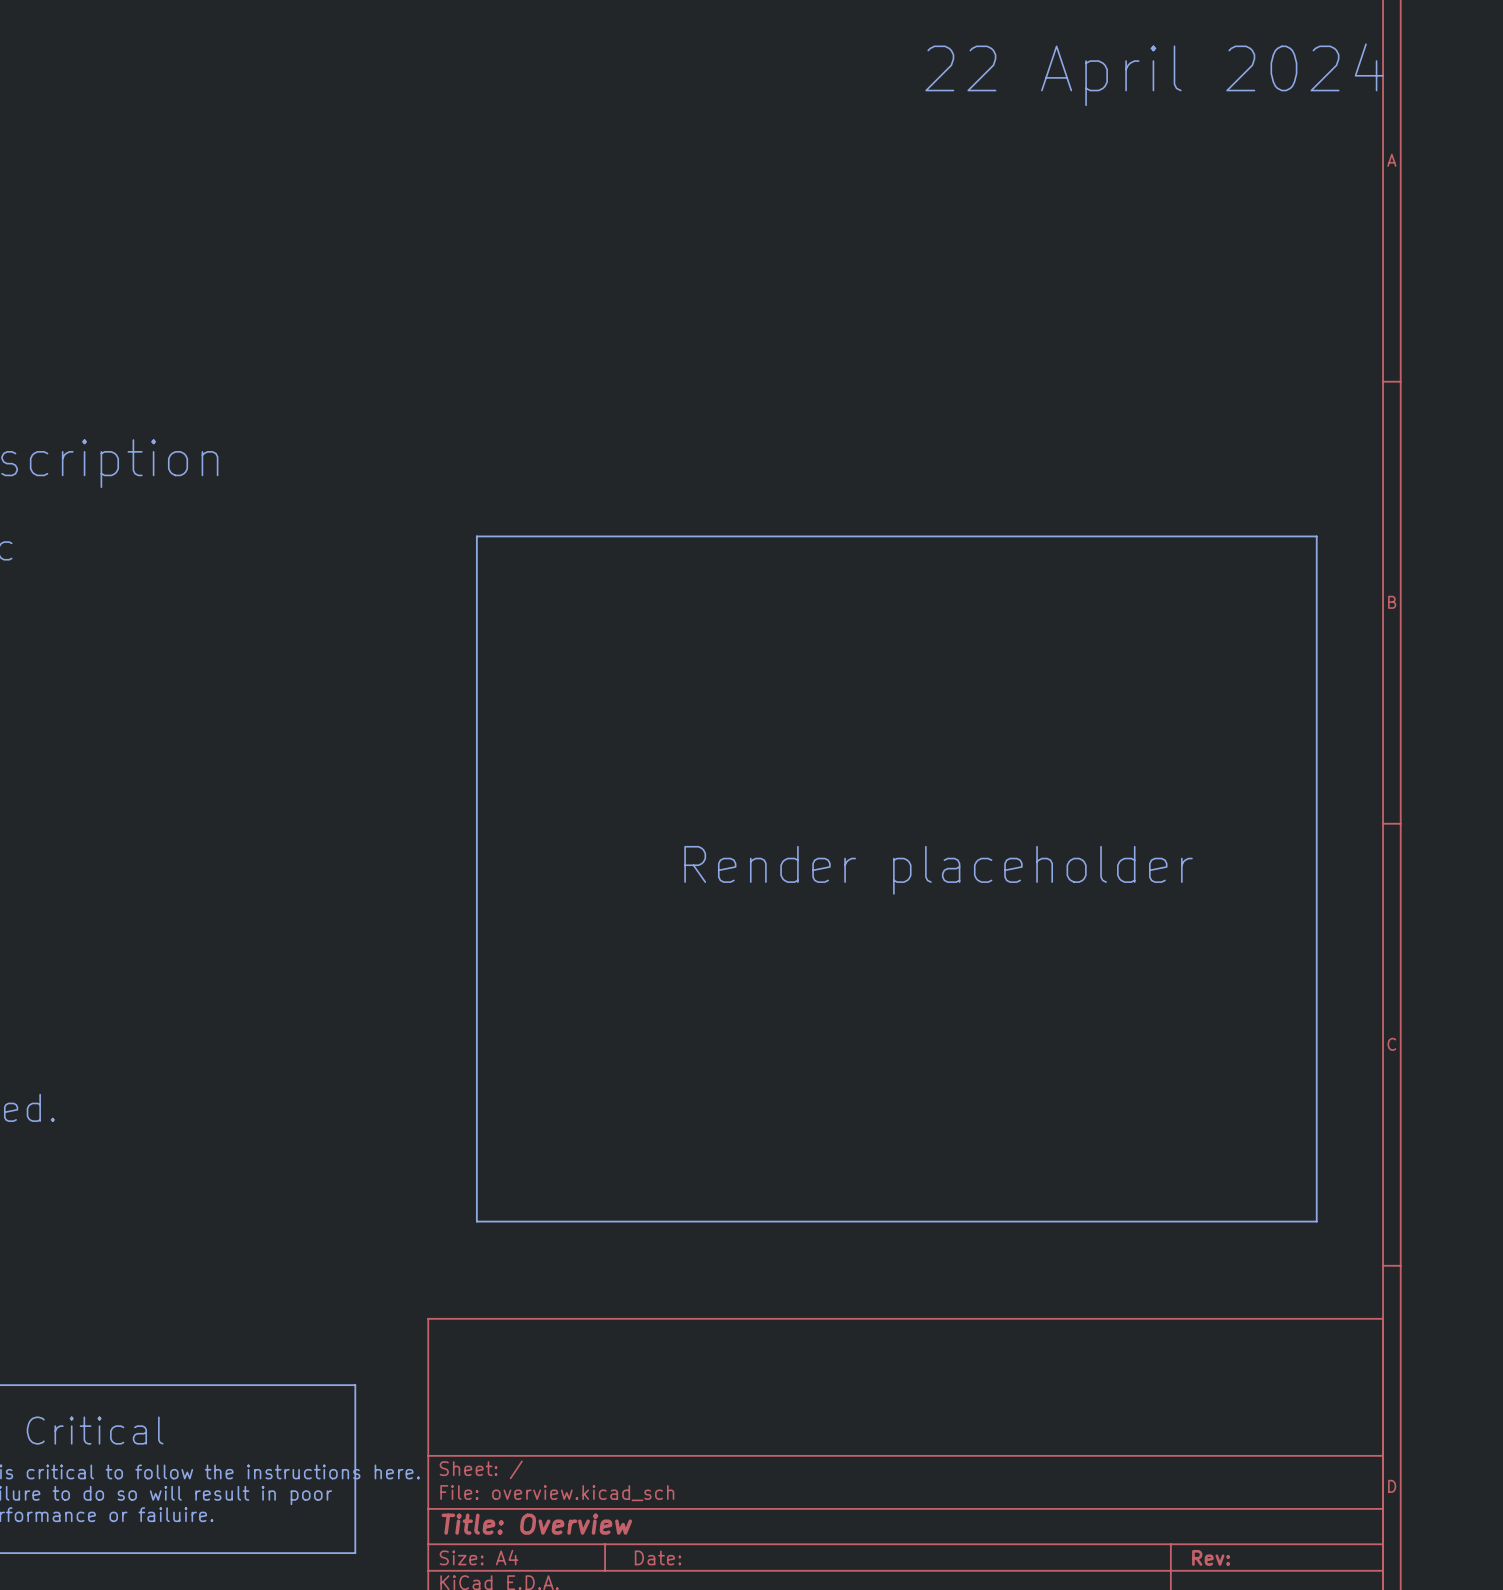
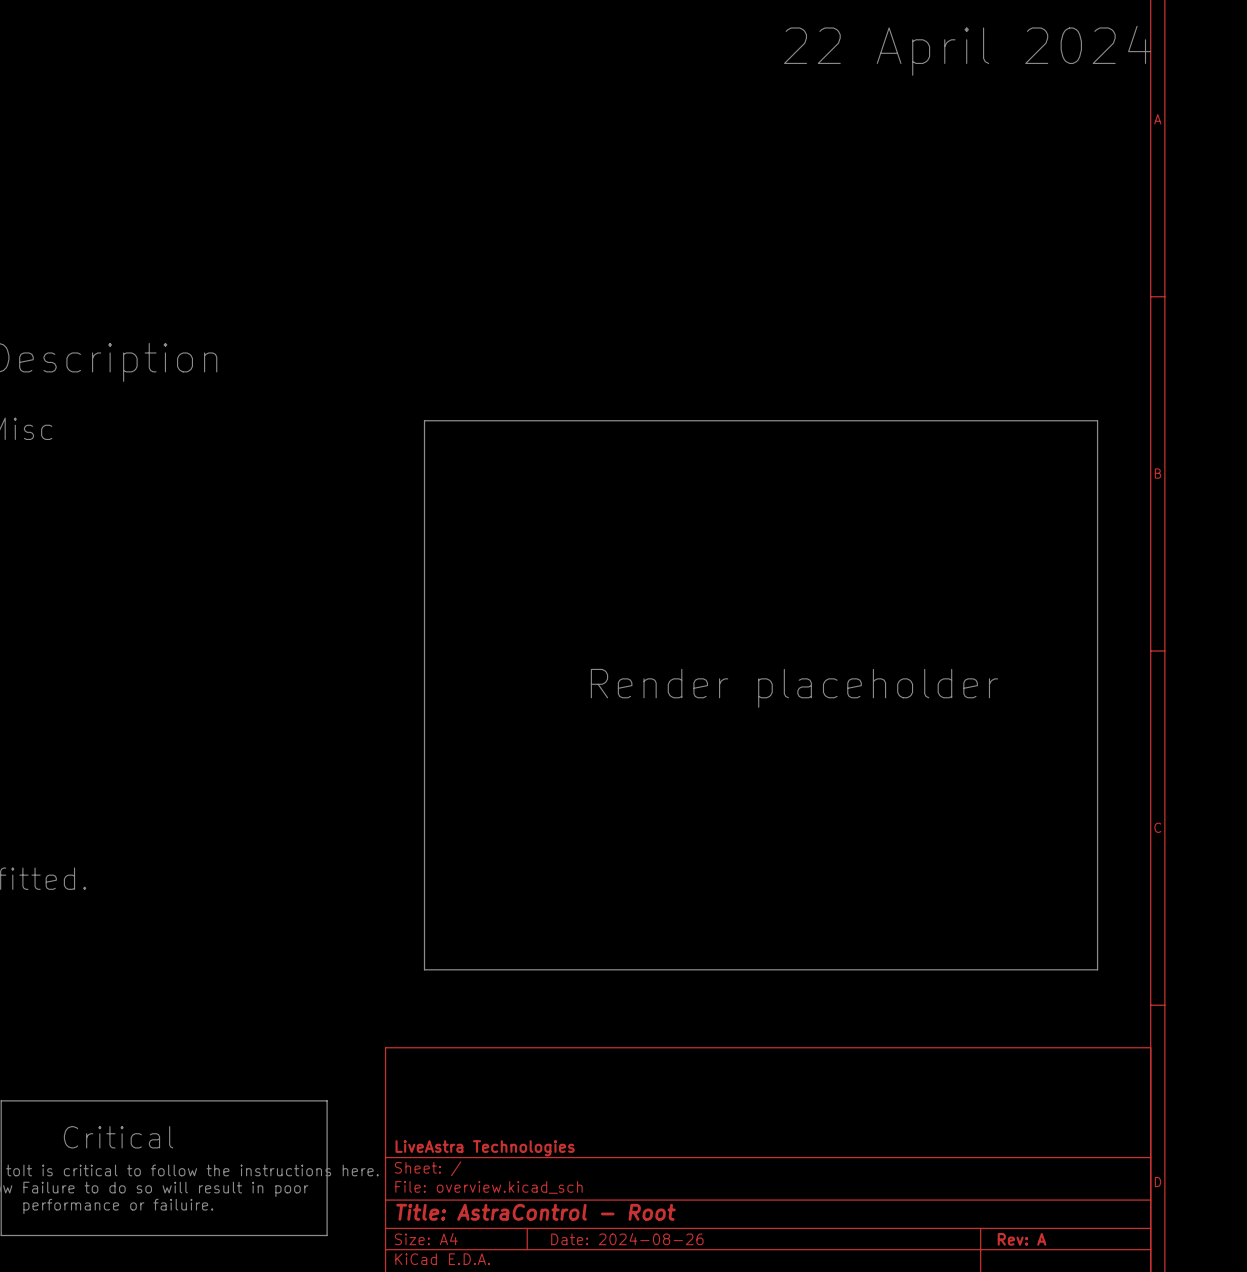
title block: none -> LiveAstra Technologies (485, 1148)
title block: Title: Overview (536, 1524) -> Title: AstraControl - Root (535, 1212)
title block: Date: (658, 1557) -> Date: 2024-08-26 (627, 1239)
title block: Rev: (1211, 1557) -> Rev: A (1022, 1239)

